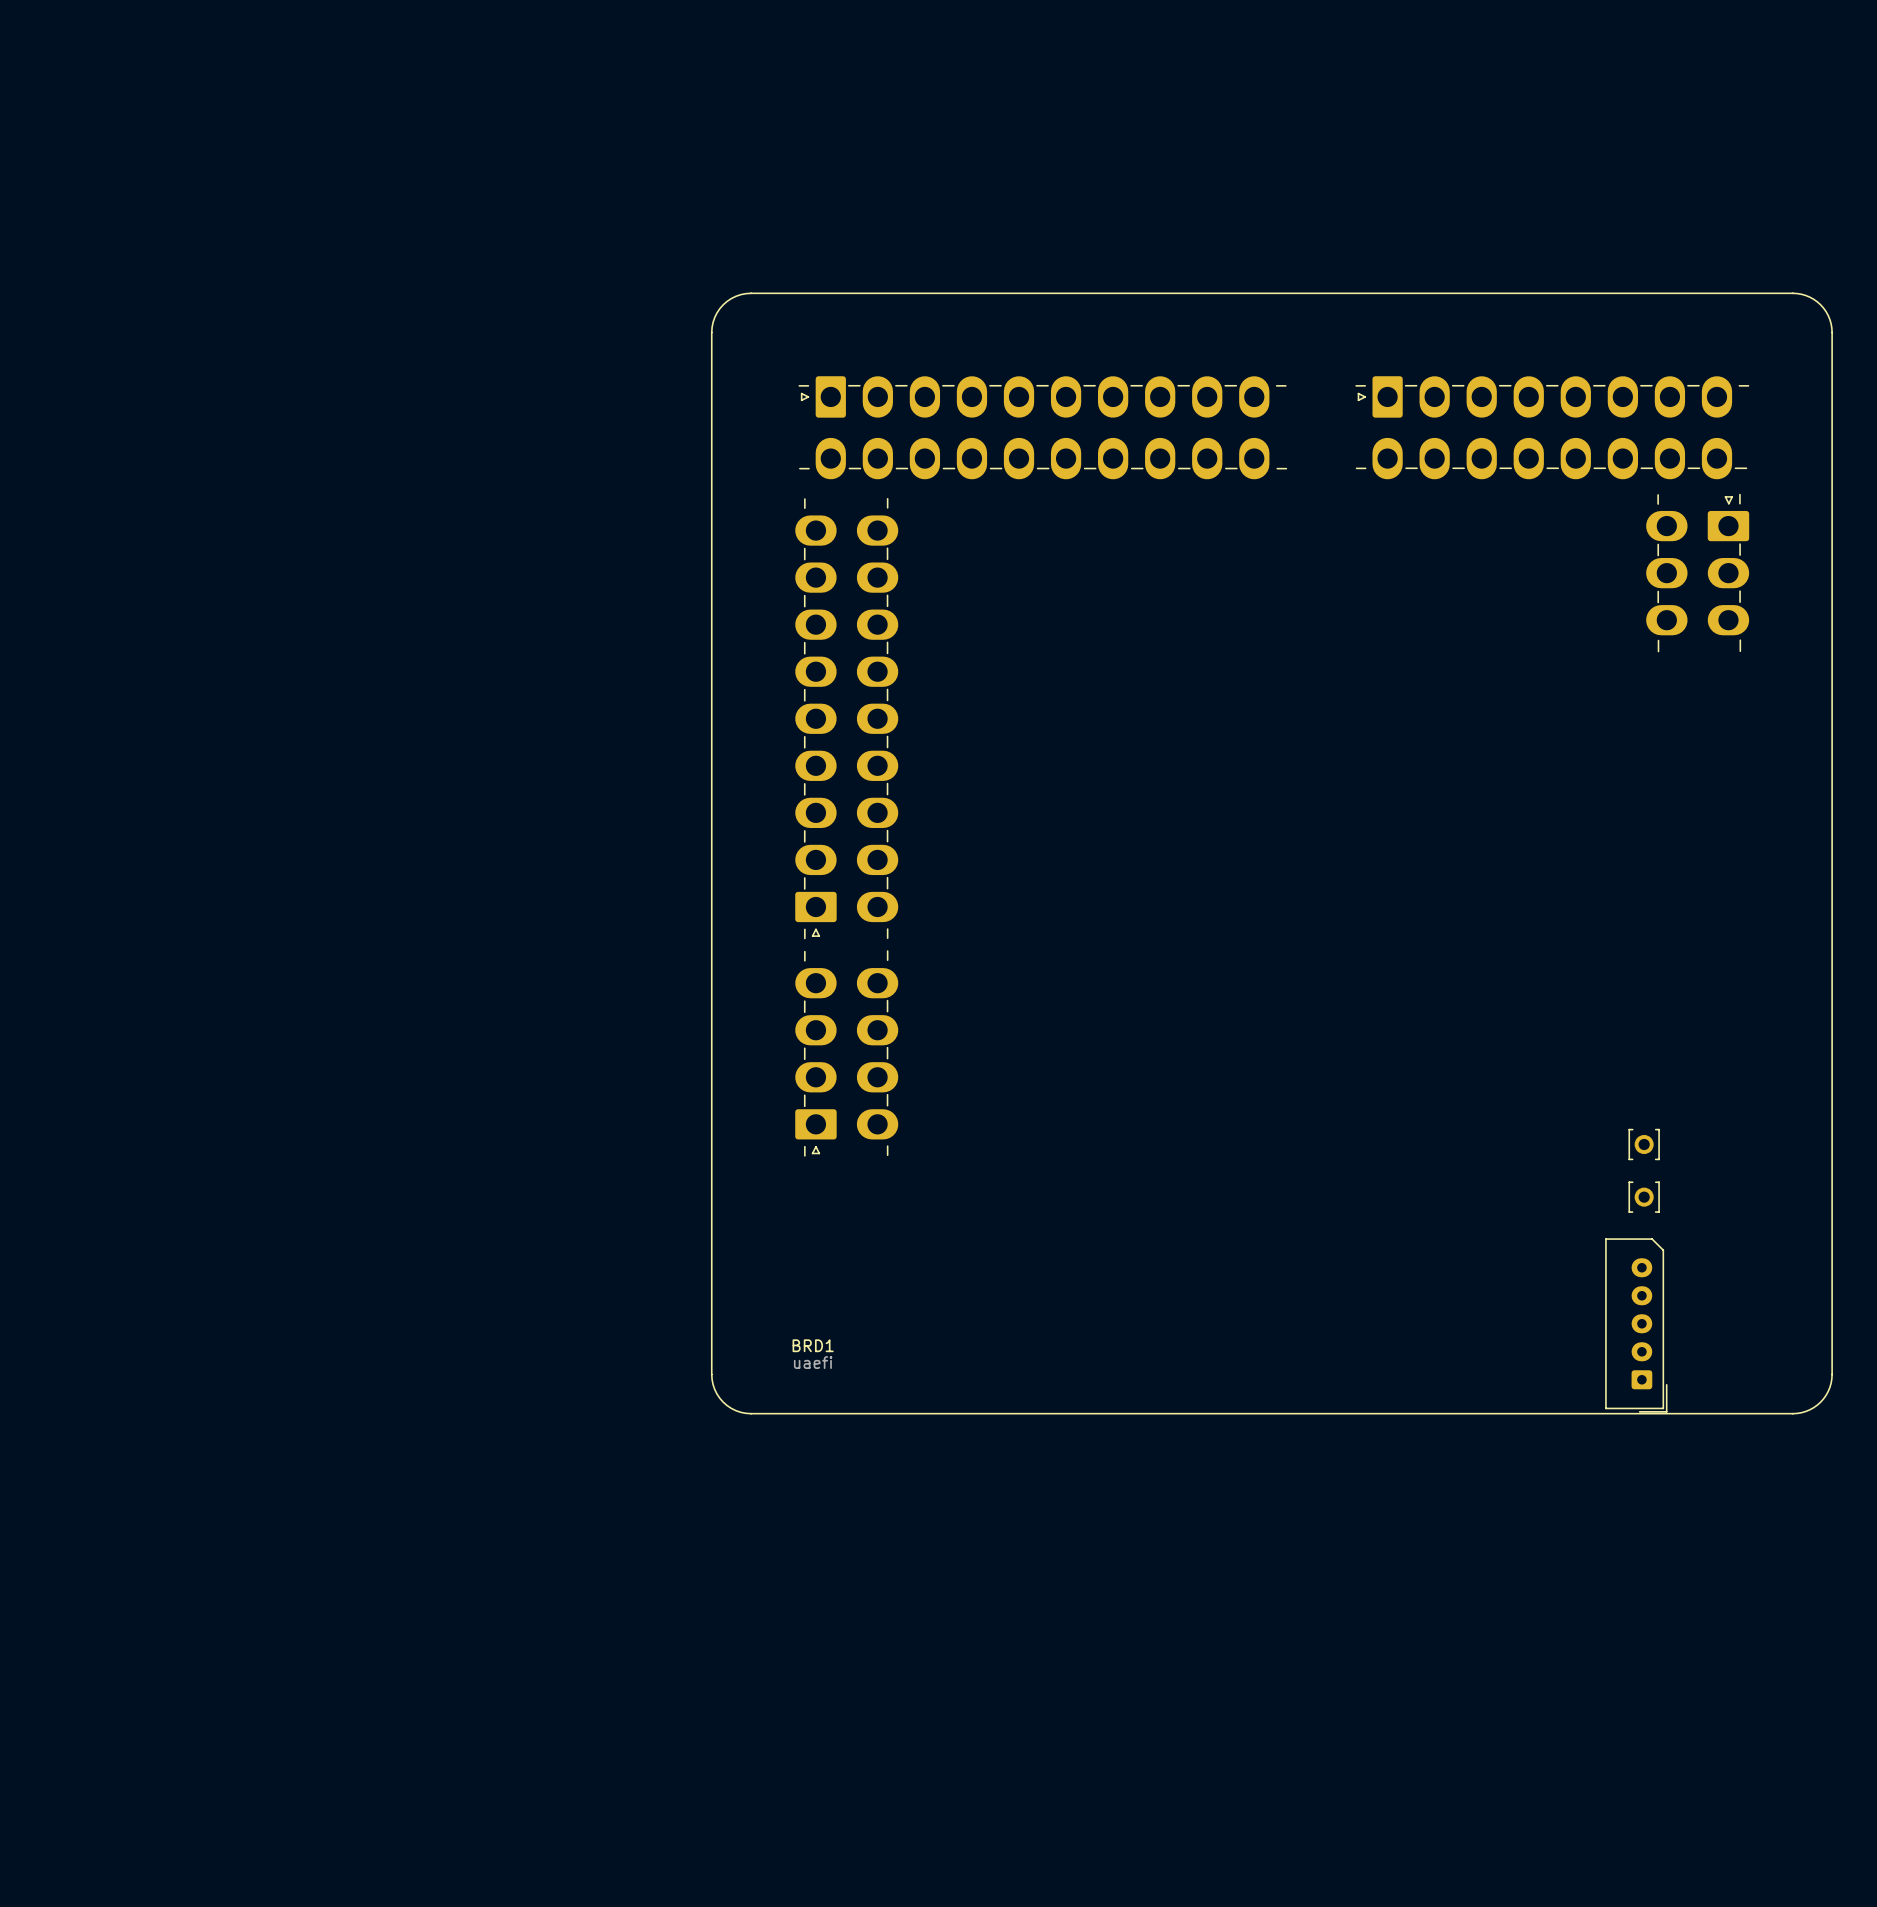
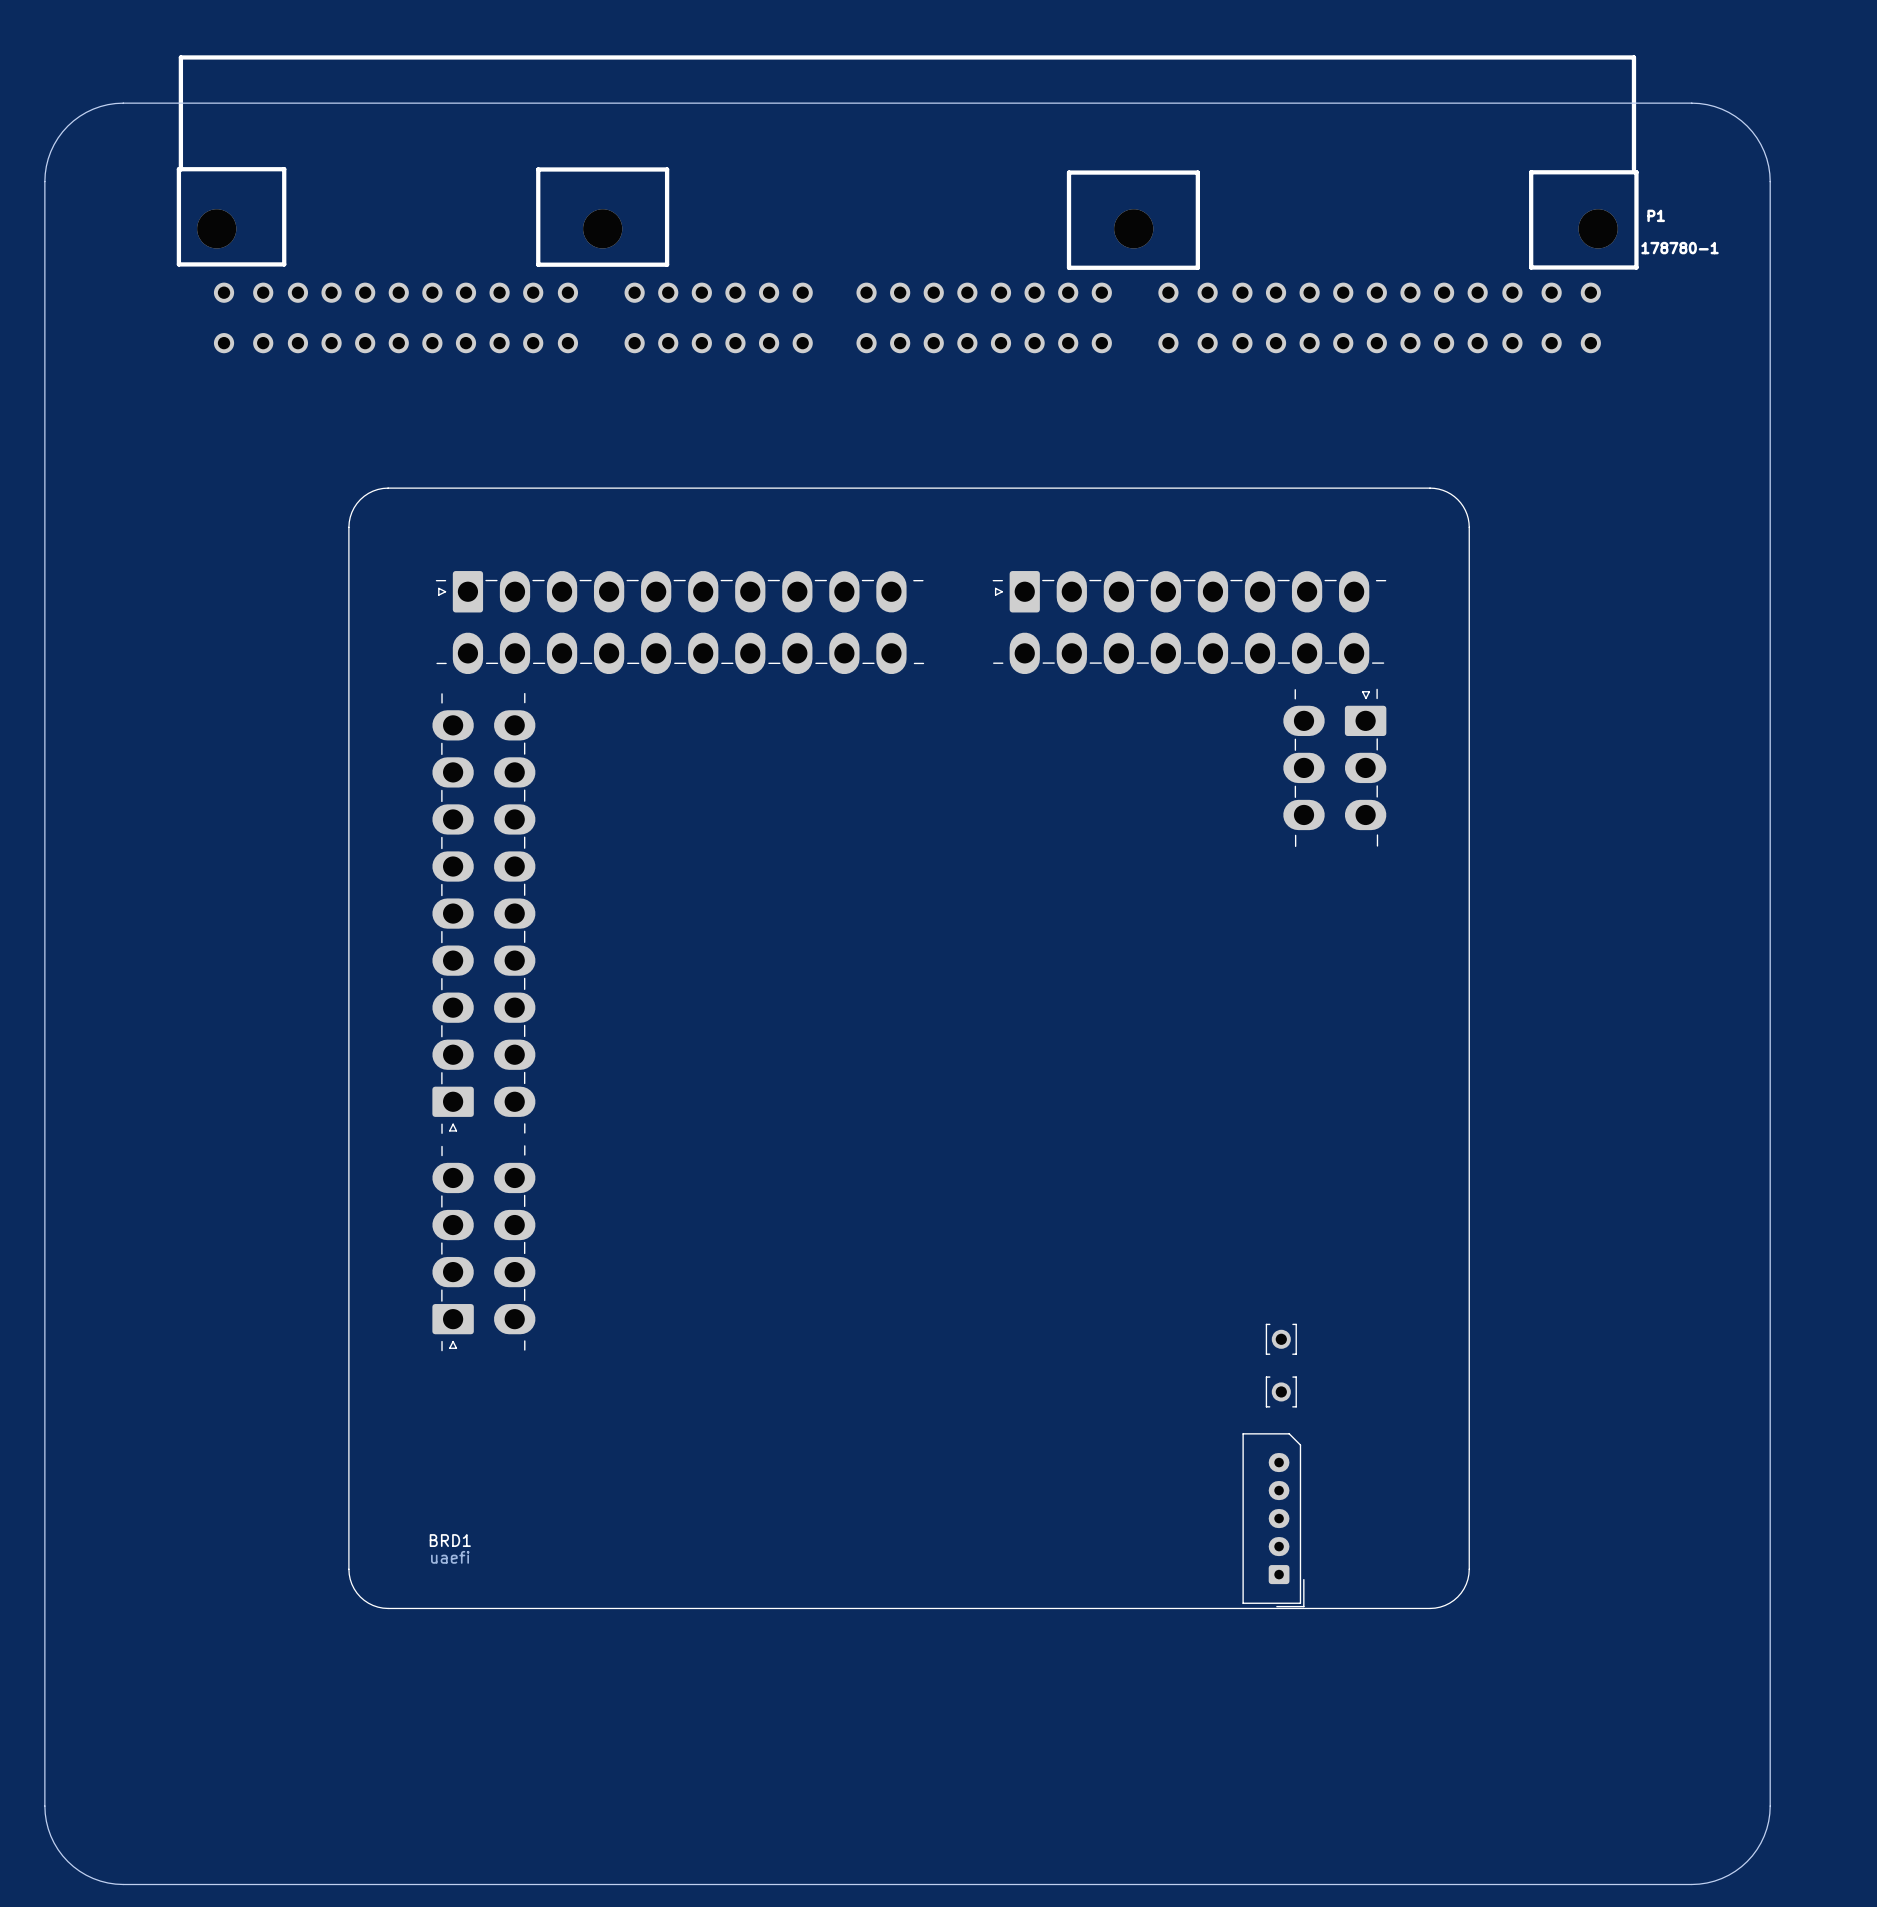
board edge: none -> (123, 103) (1691, 103) (1707, 104) (1721, 109) (1735, 116) (1747, 126) (1756, 138) (1764, 151) (1768, 166) (1770, 181) (1770, 1806) (1768, 1821) (1764, 1836) (1756, 1849) (1747, 1861) (1735, 1871) (1721, 1878) (1707, 1882) (1691, 1884) (123, 1884) (107, 1882) (93, 1878) (79, 1871) (67, 1861) (58, 1849) (50, 1836) (46, 1821) (44, 1806) (44, 181) (46, 166) (50, 151) (58, 138) (67, 126) (79, 116) (93, 109) (107, 104) (123, 103)
P1: none -> 178780-1 (907, 204)
BRD1 footprint: [711, 292, 1833, 1415] -> [348, 487, 1470, 1610]

